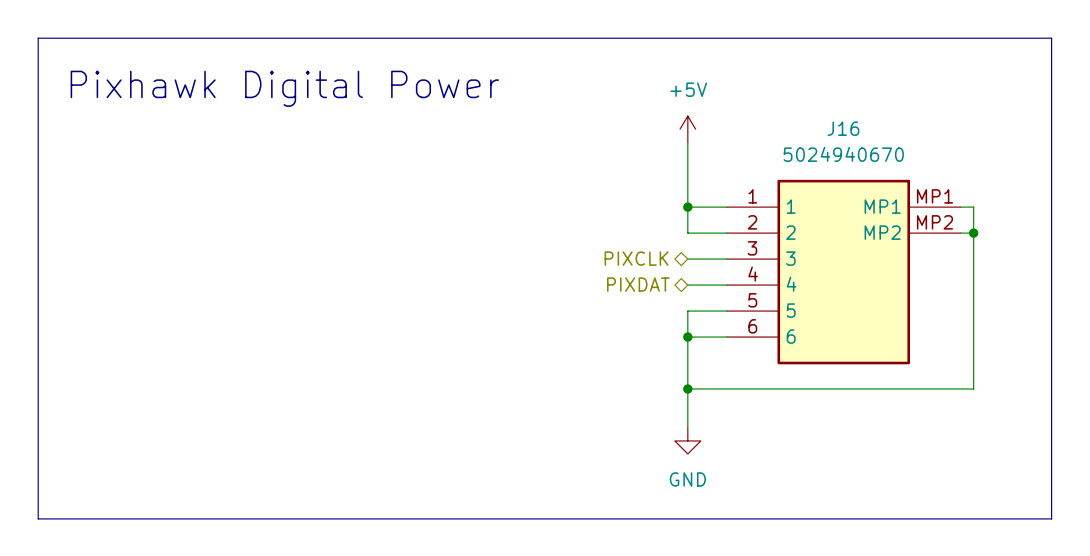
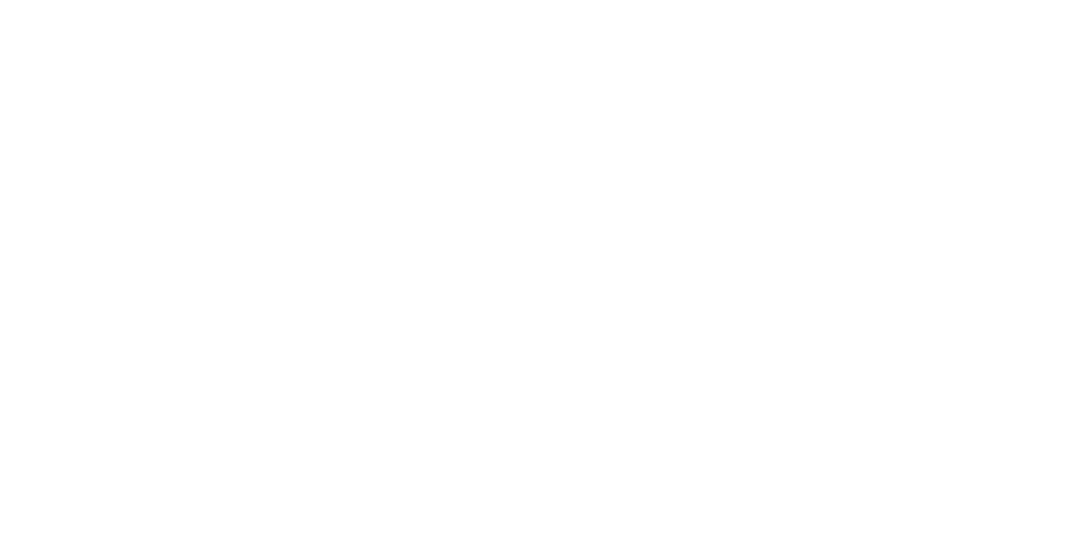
line: (38, 38) (1051, 38) (1051, 518) (38, 518) (38, 38) -> none
text: Pixhawk Digital Power (284, 88) -> none
power symbol: +5V (687, 129) -> none
wire: (687, 142) (687, 233) (726, 233) -> none
wire: (687, 207) (726, 207) -> none
junction: (687, 207) -> none
wire: (960, 207) (973, 207) (973, 389) (687, 389) -> none
wire: (960, 233) (973, 233) -> none
junction: (973, 233) -> none
hierarchical label: PIXCLK (636, 258) -> none
wire: (687, 259) (726, 259) -> none
J16: 5024940670 (843, 272) -> none
hierarchical label: PIXDAT (638, 284) -> none
wire: (687, 285) (726, 285) -> none
wire: (726, 311) (687, 311) (687, 427) -> none
wire: (687, 337) (726, 337) -> none
junction: (687, 337) -> none
junction: (687, 389) -> none
power symbol: GND (687, 440) -> none

